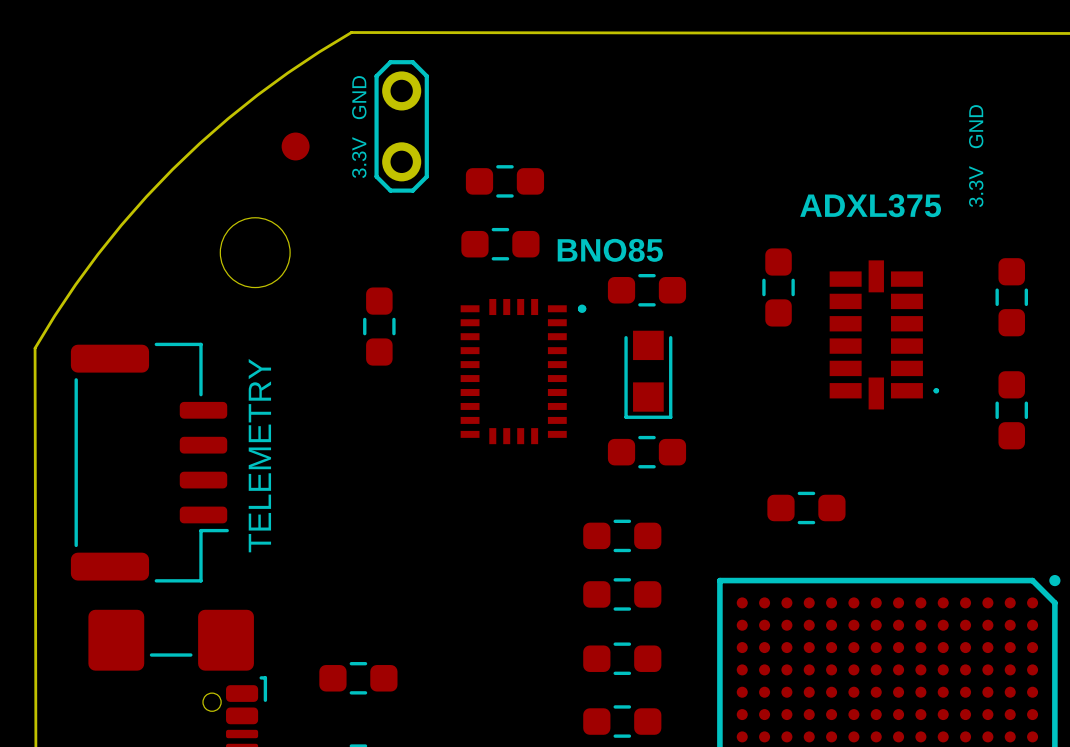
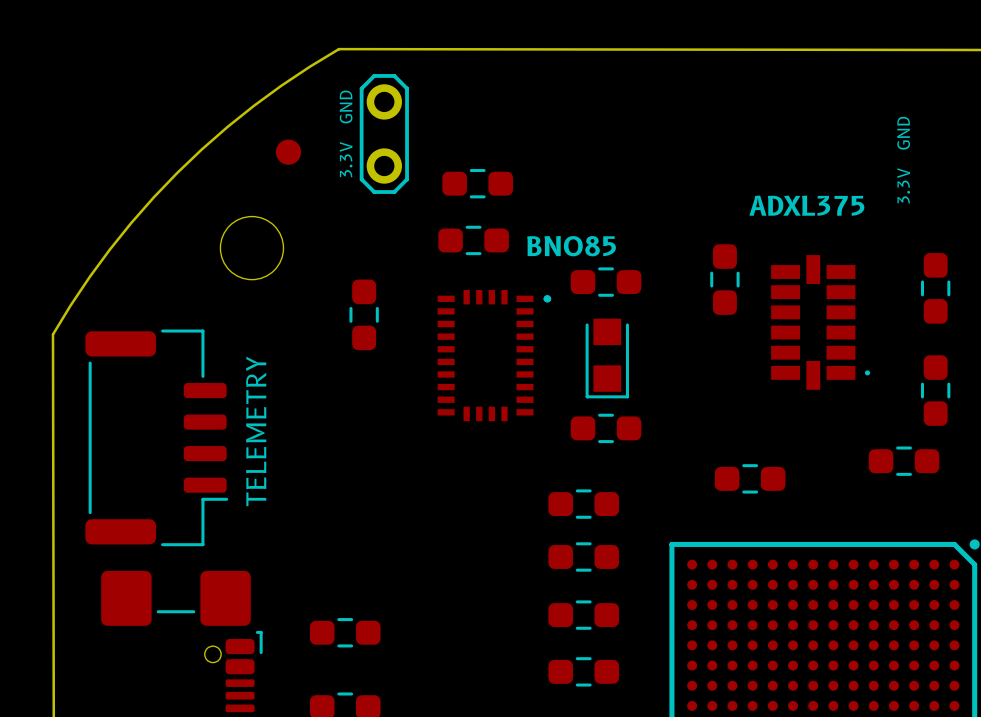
part: none -> (904, 461)

